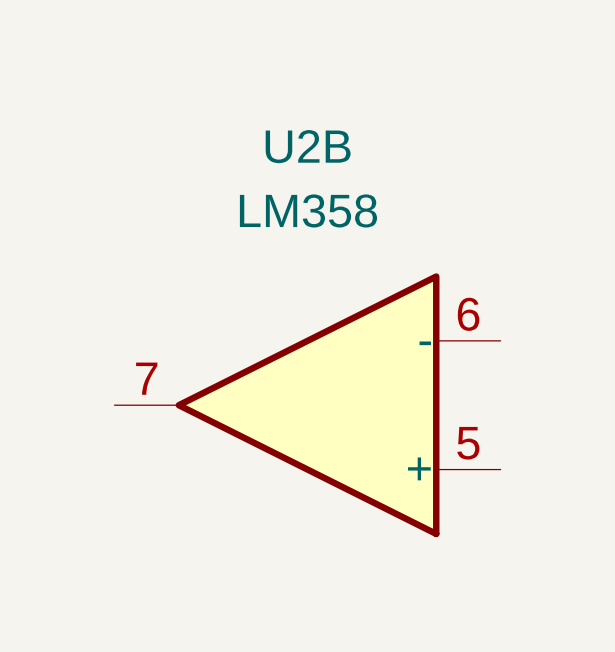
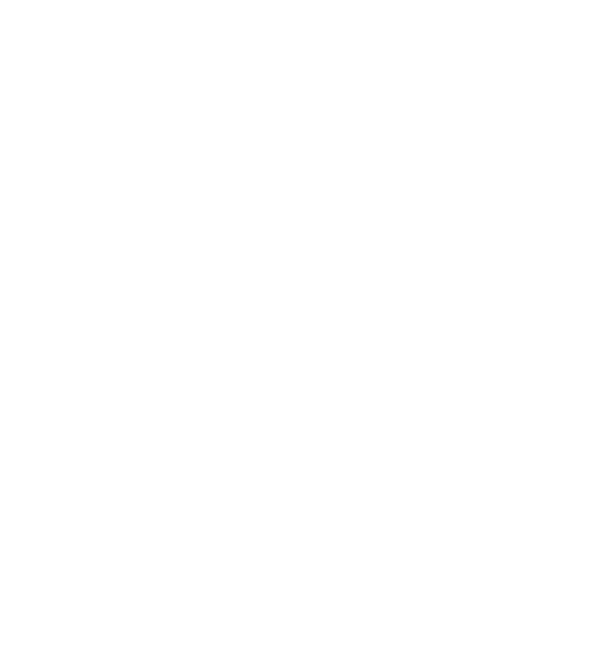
U2B: LM358 (307, 405) -> none

